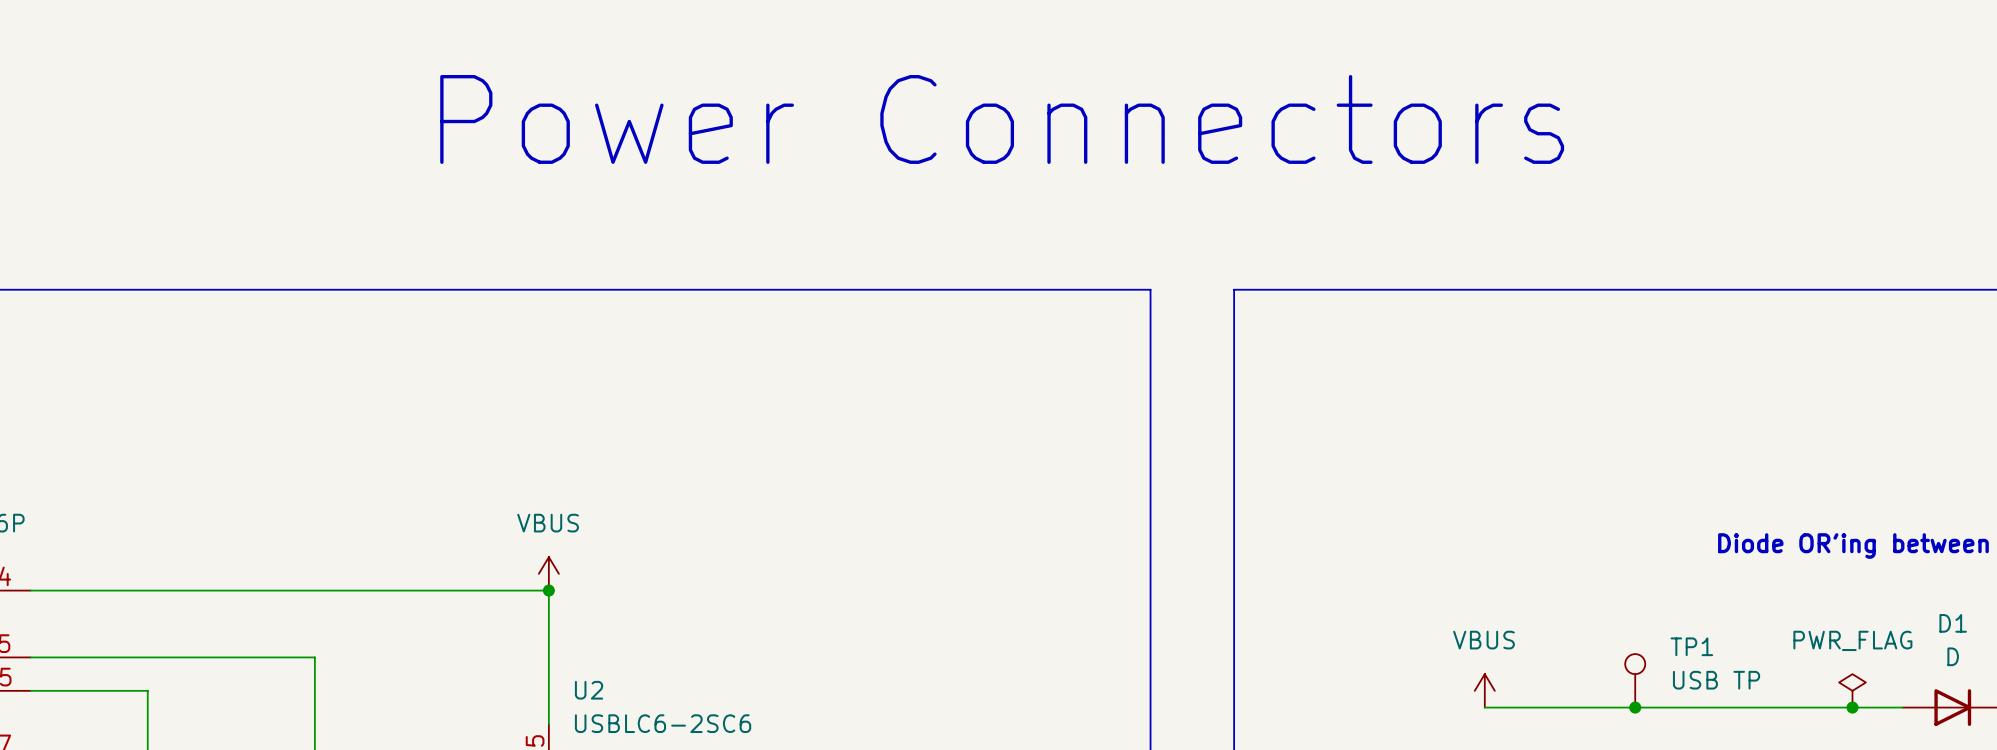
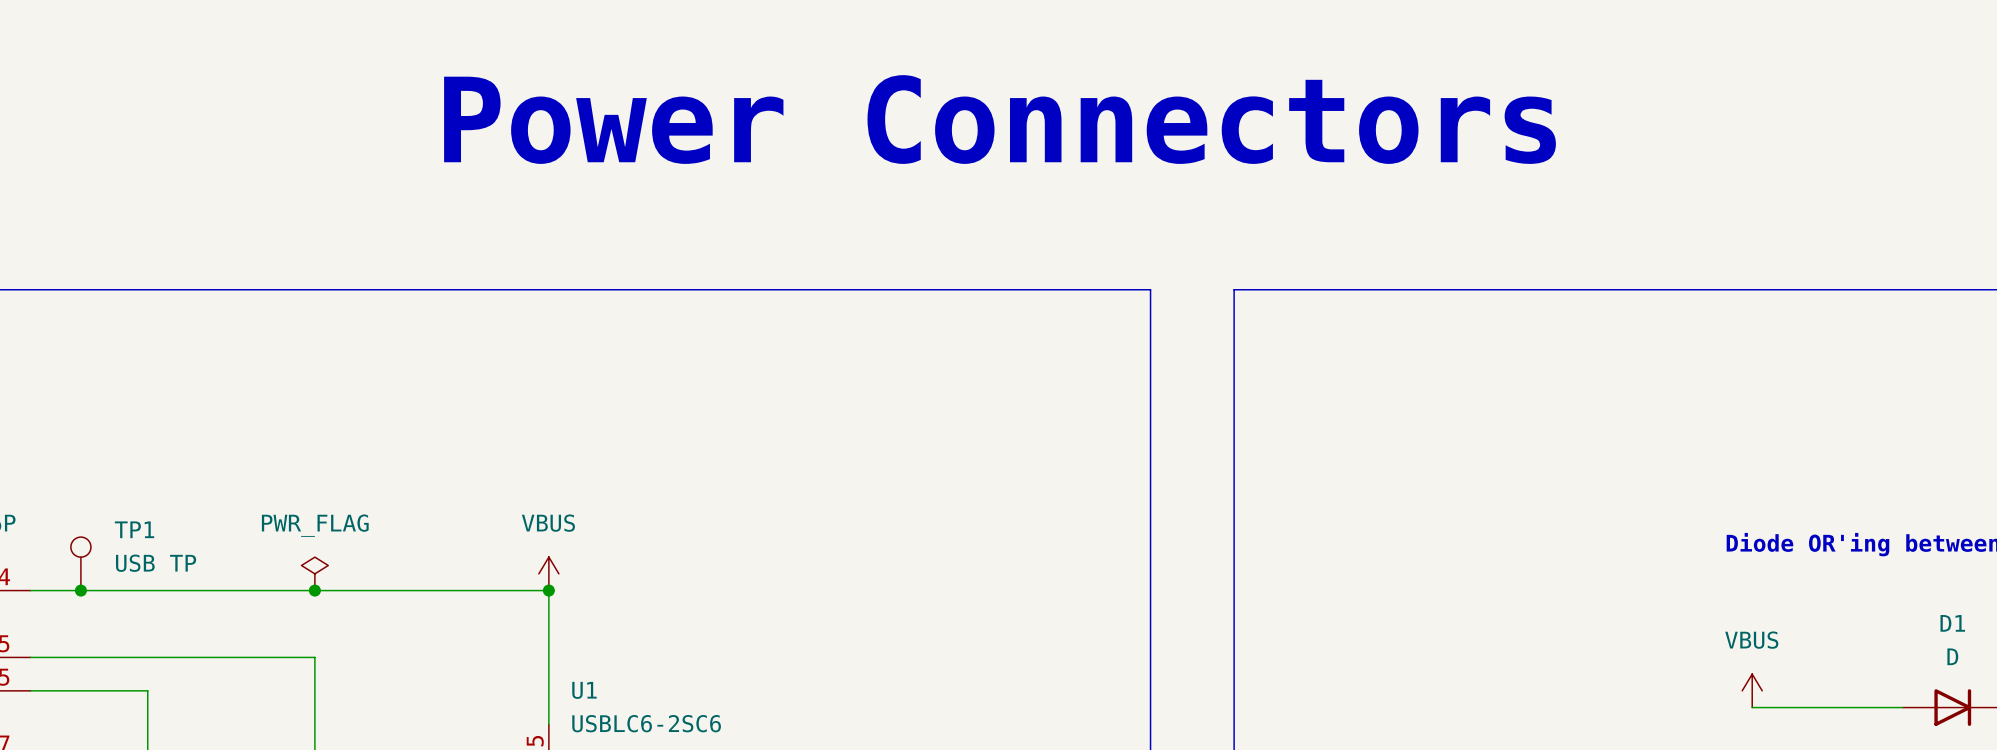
power symbol: none -> PWR_FLAG (314, 573)
junction: none -> (80, 590)
junction: none -> (314, 590)
TP1 position: (1635, 680) -> (80, 563)
U2 name: U2 (589, 690) -> U1 (584, 690)
power symbol position: VBUS (1484, 690) -> VBUS (1752, 690)
power symbol: PWR_FLAG (1852, 690) -> none
wire: (1484, 707) (1752, 707) -> none
junction: (1635, 707) -> none
junction: (1852, 707) -> none

